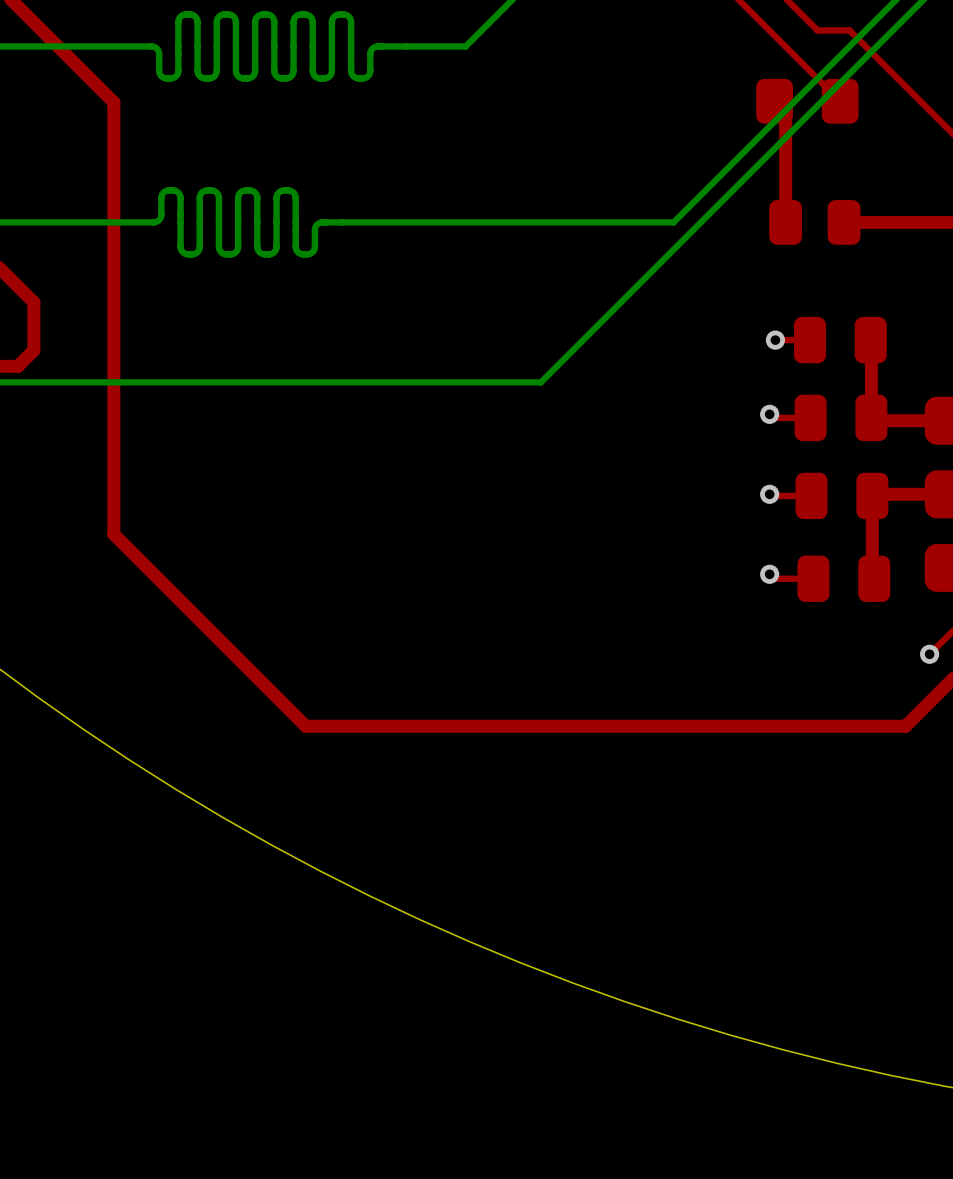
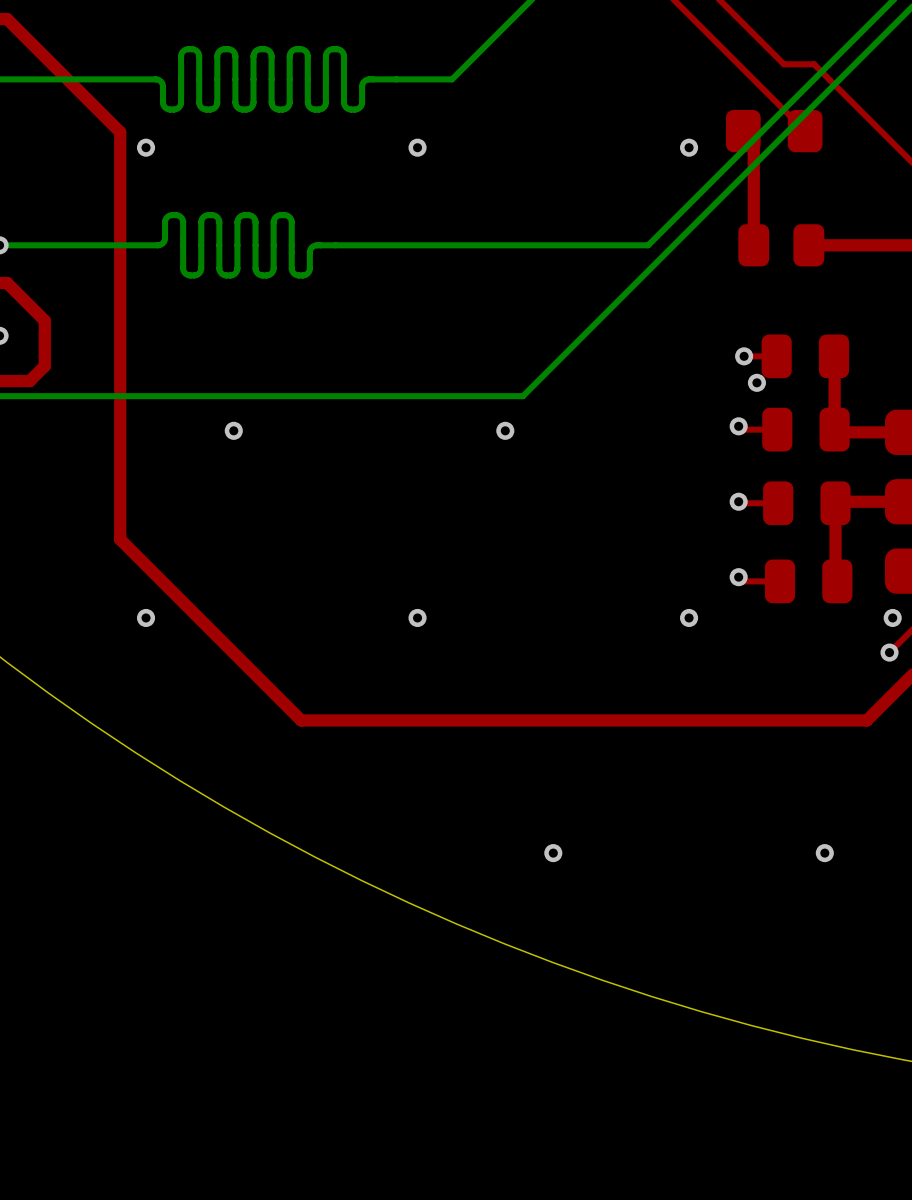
via: none -> (146, 147)
via: none -> (417, 147)
via: none -> (689, 147)
via: none -> (756, 382)
via: none -> (233, 430)
via: none -> (505, 430)
via: none -> (146, 617)
via: none -> (417, 617)
via: none -> (689, 617)
via: none -> (892, 617)
via: none -> (553, 853)
via: none -> (824, 853)

